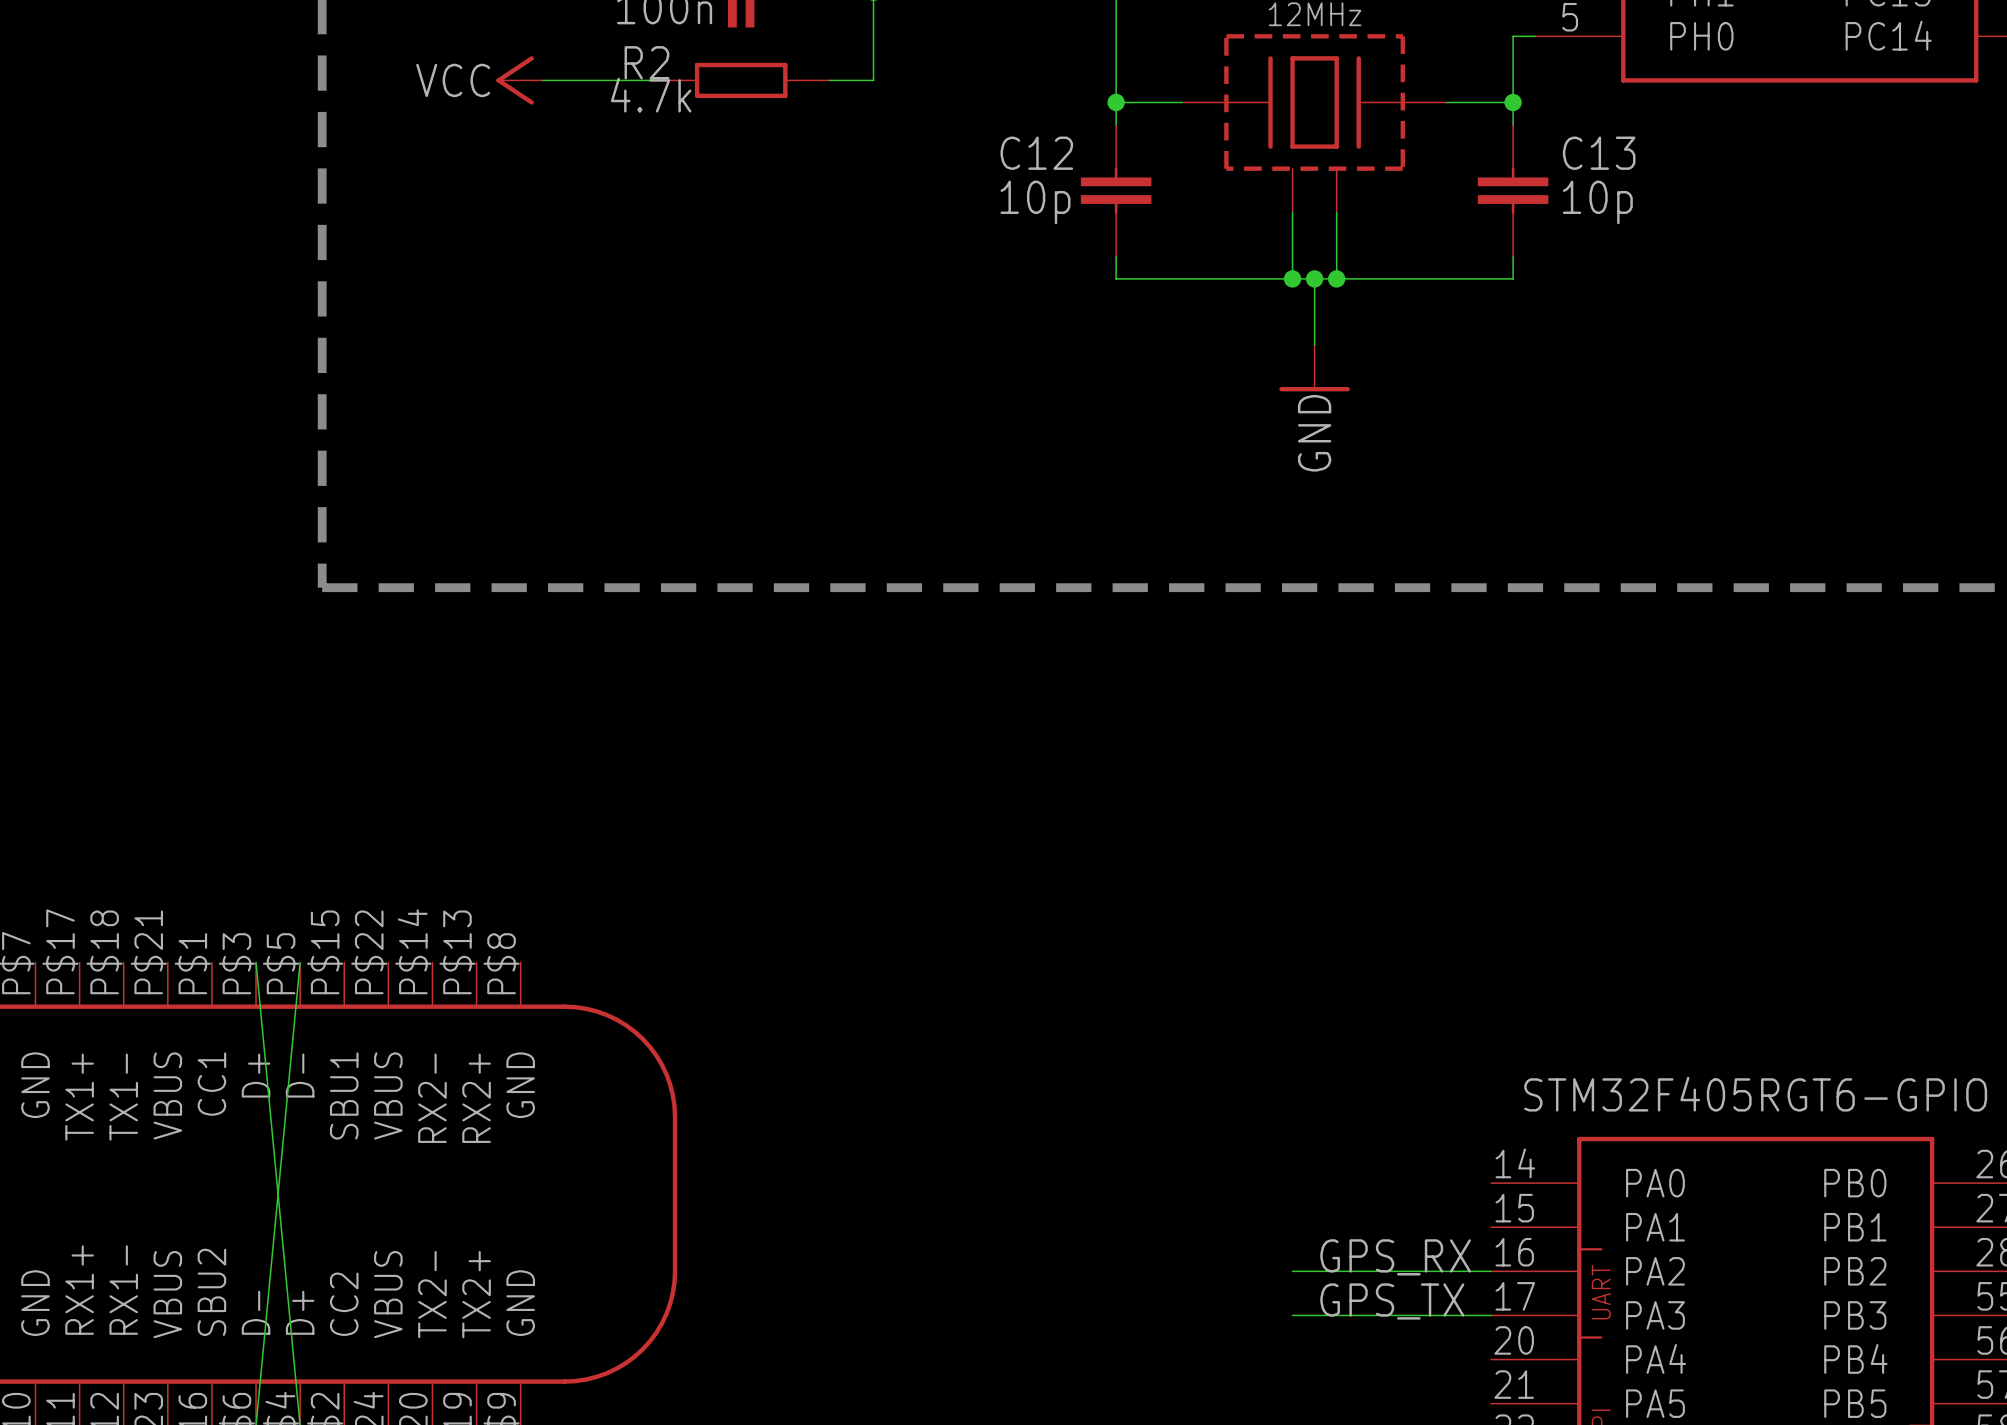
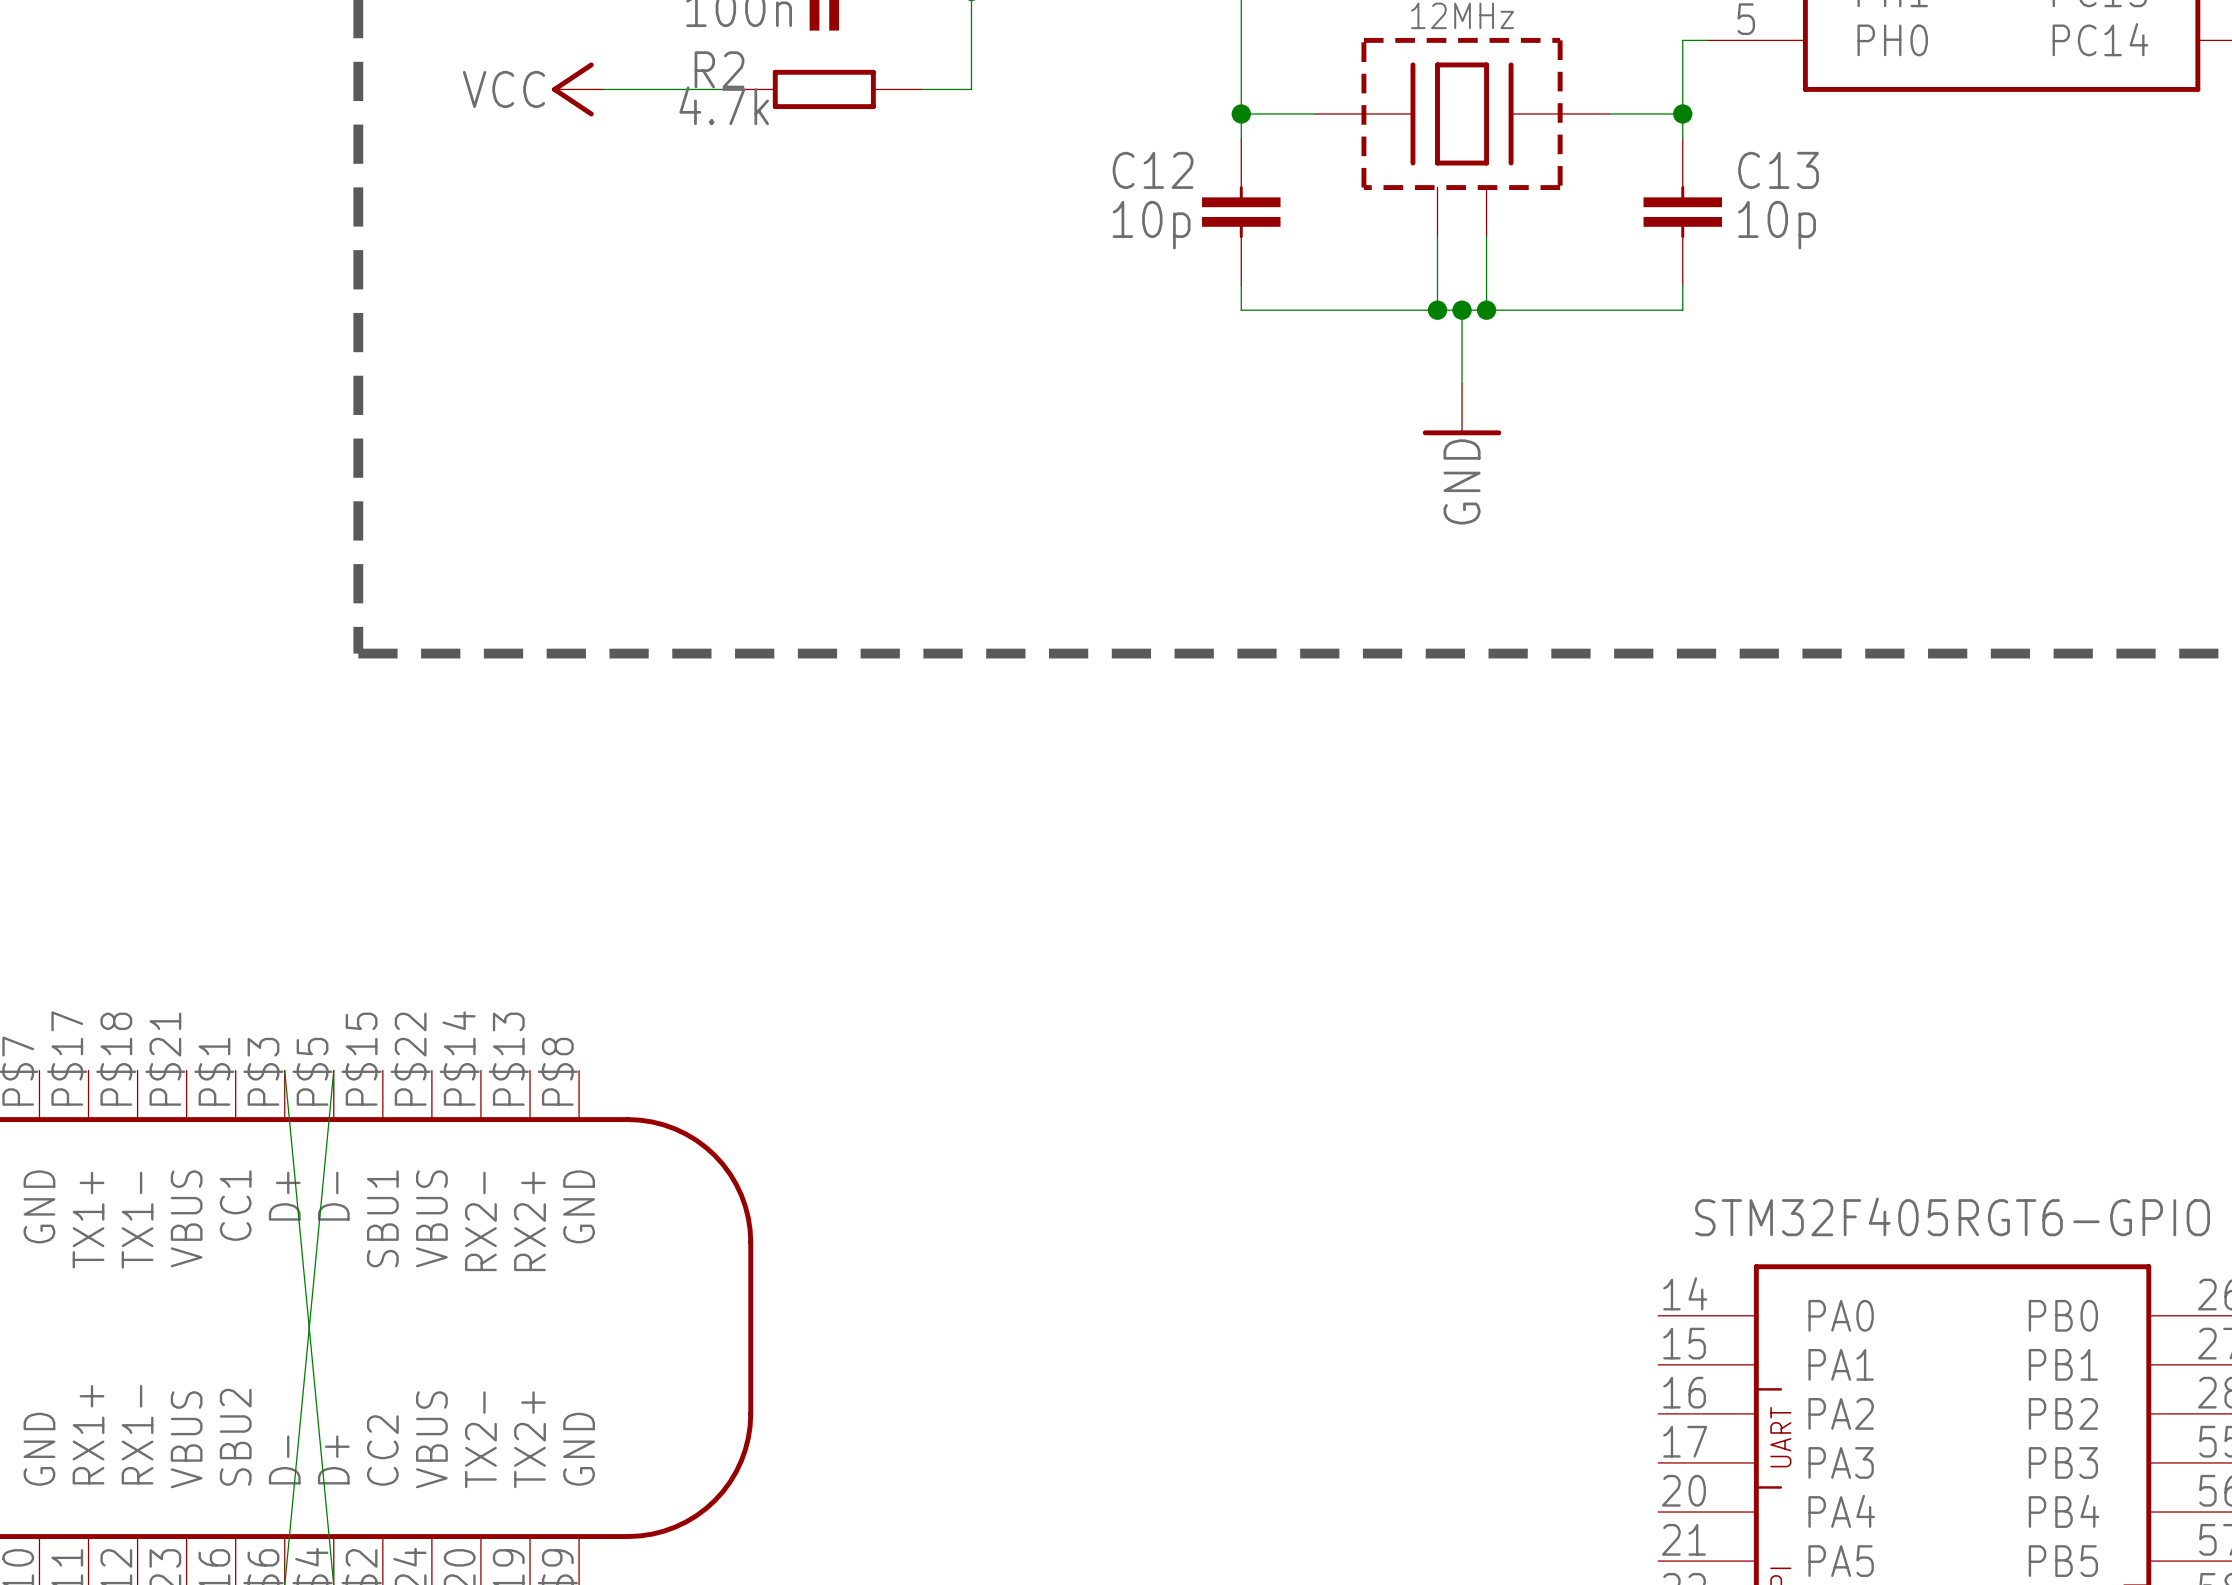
label: GPS_RX (1395, 1257) -> none
wire: (1292, 1271) (1491, 1271) -> none
label: GPS_TX (1392, 1301) -> none
wire: (1292, 1315) (1491, 1315) -> none

